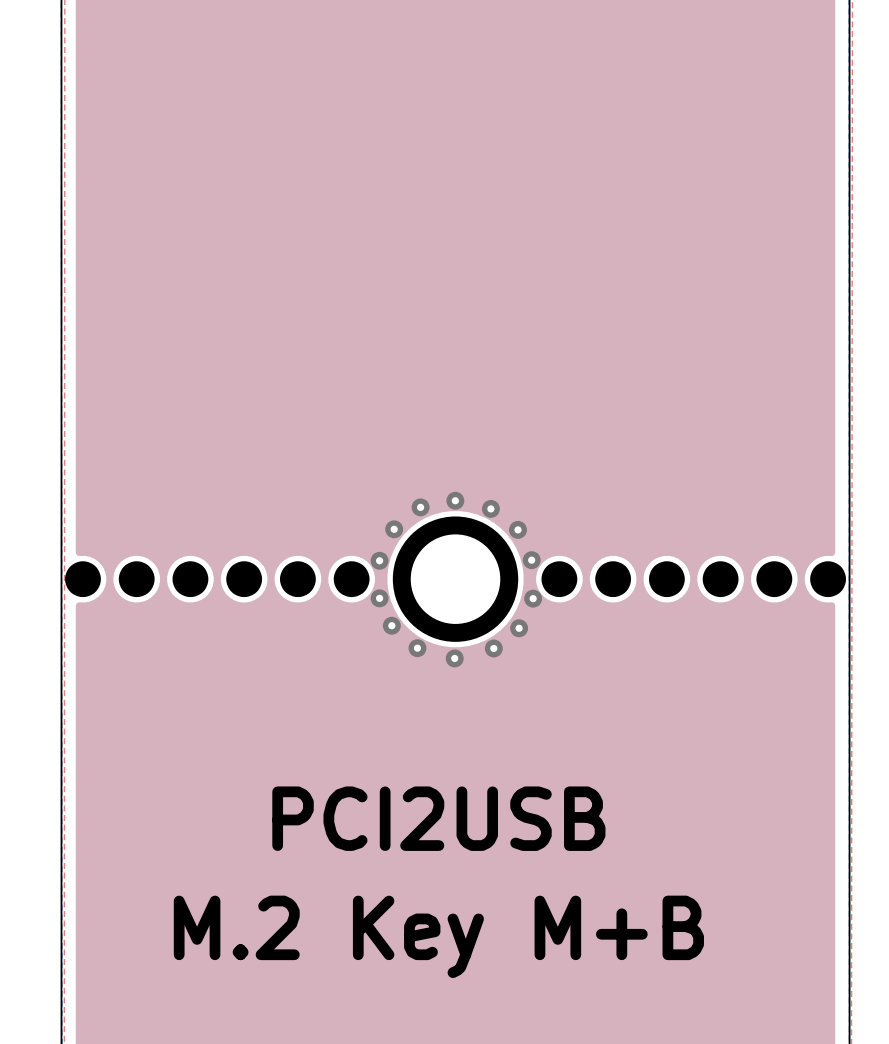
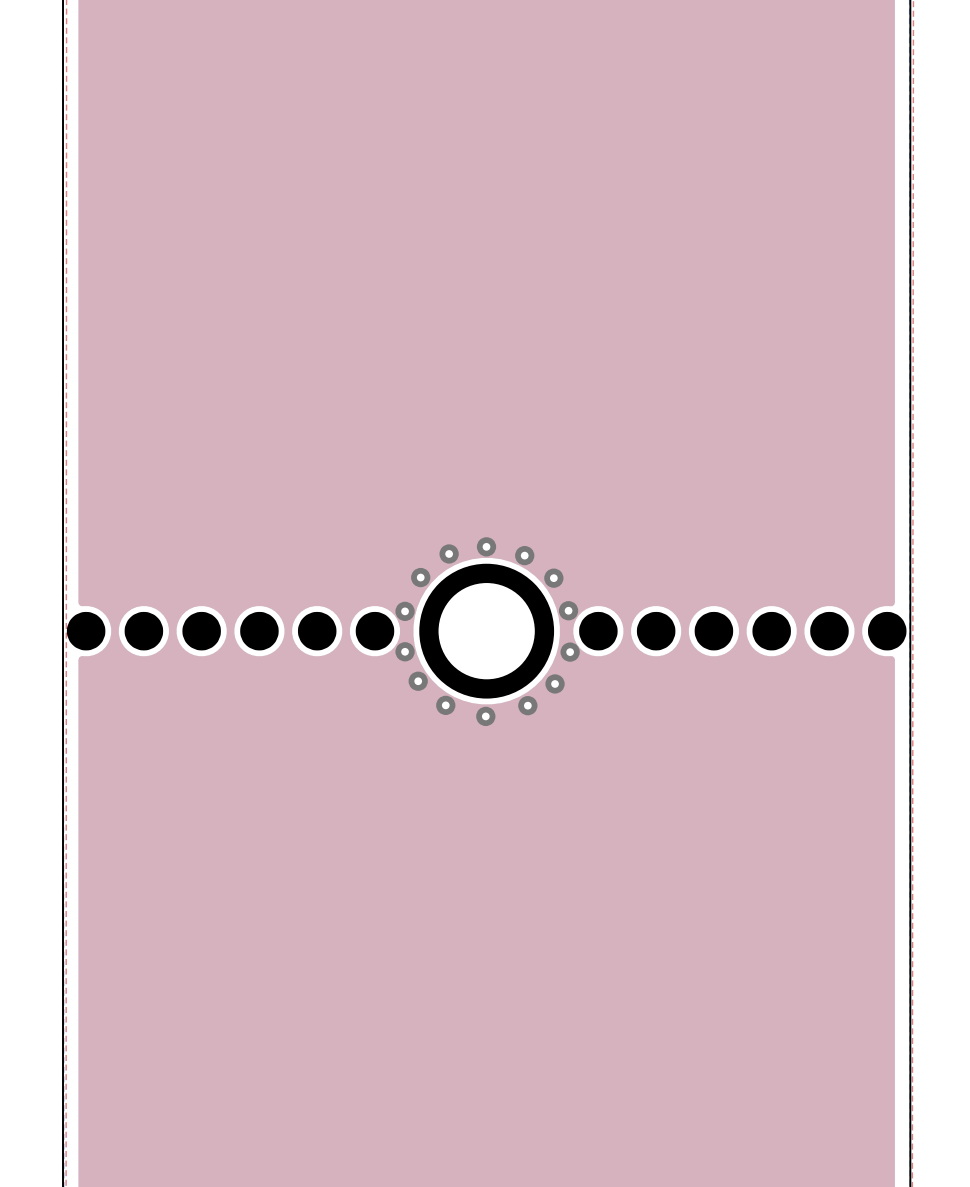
text: PCI2USB (438, 818) -> none
text: M.2 Key M+B (438, 936) -> none

